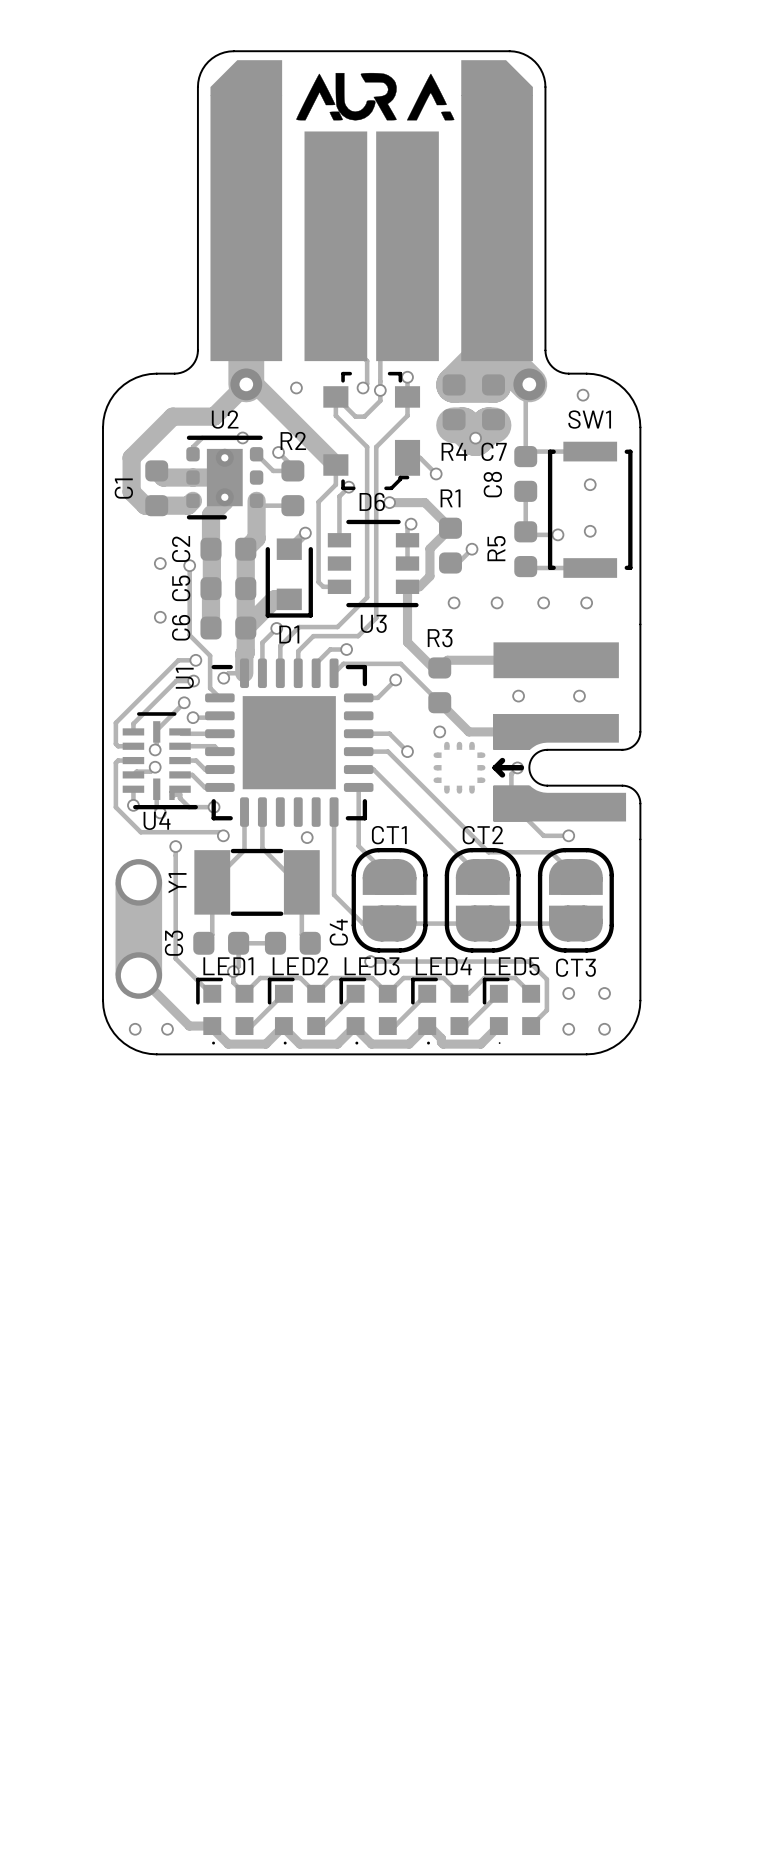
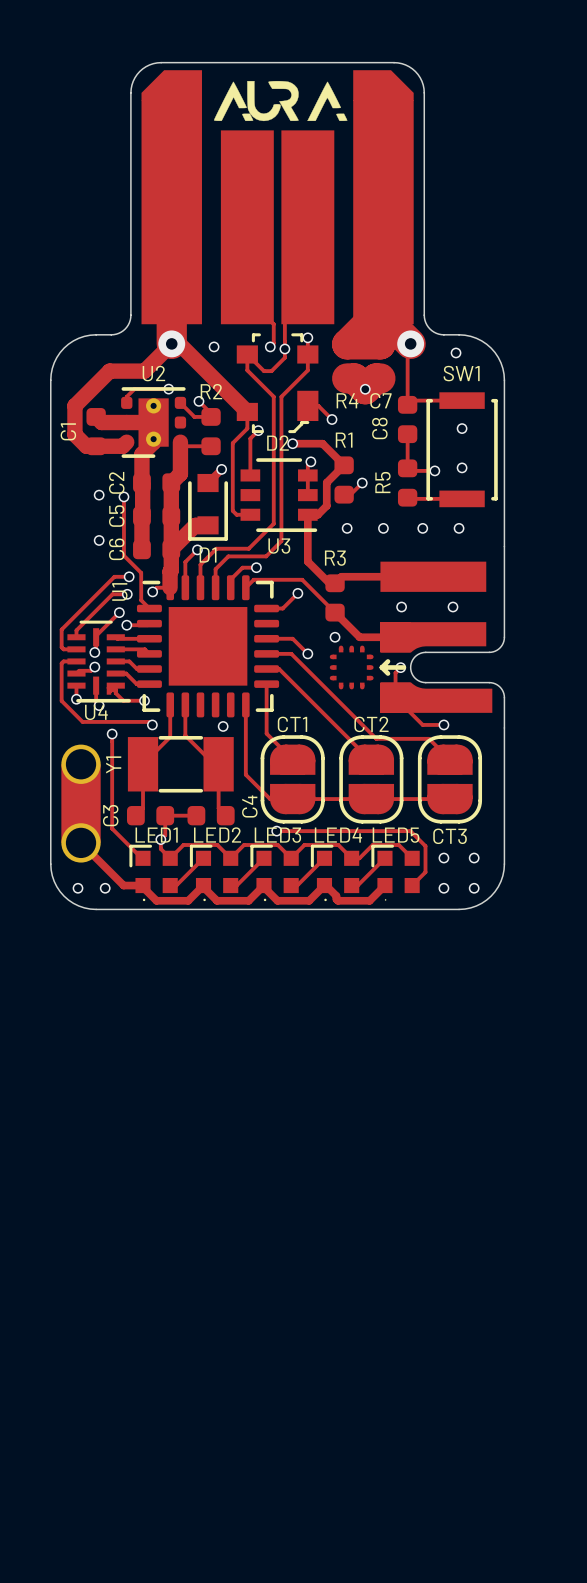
D6 name: D6 (372, 501) -> D2 (277, 443)

